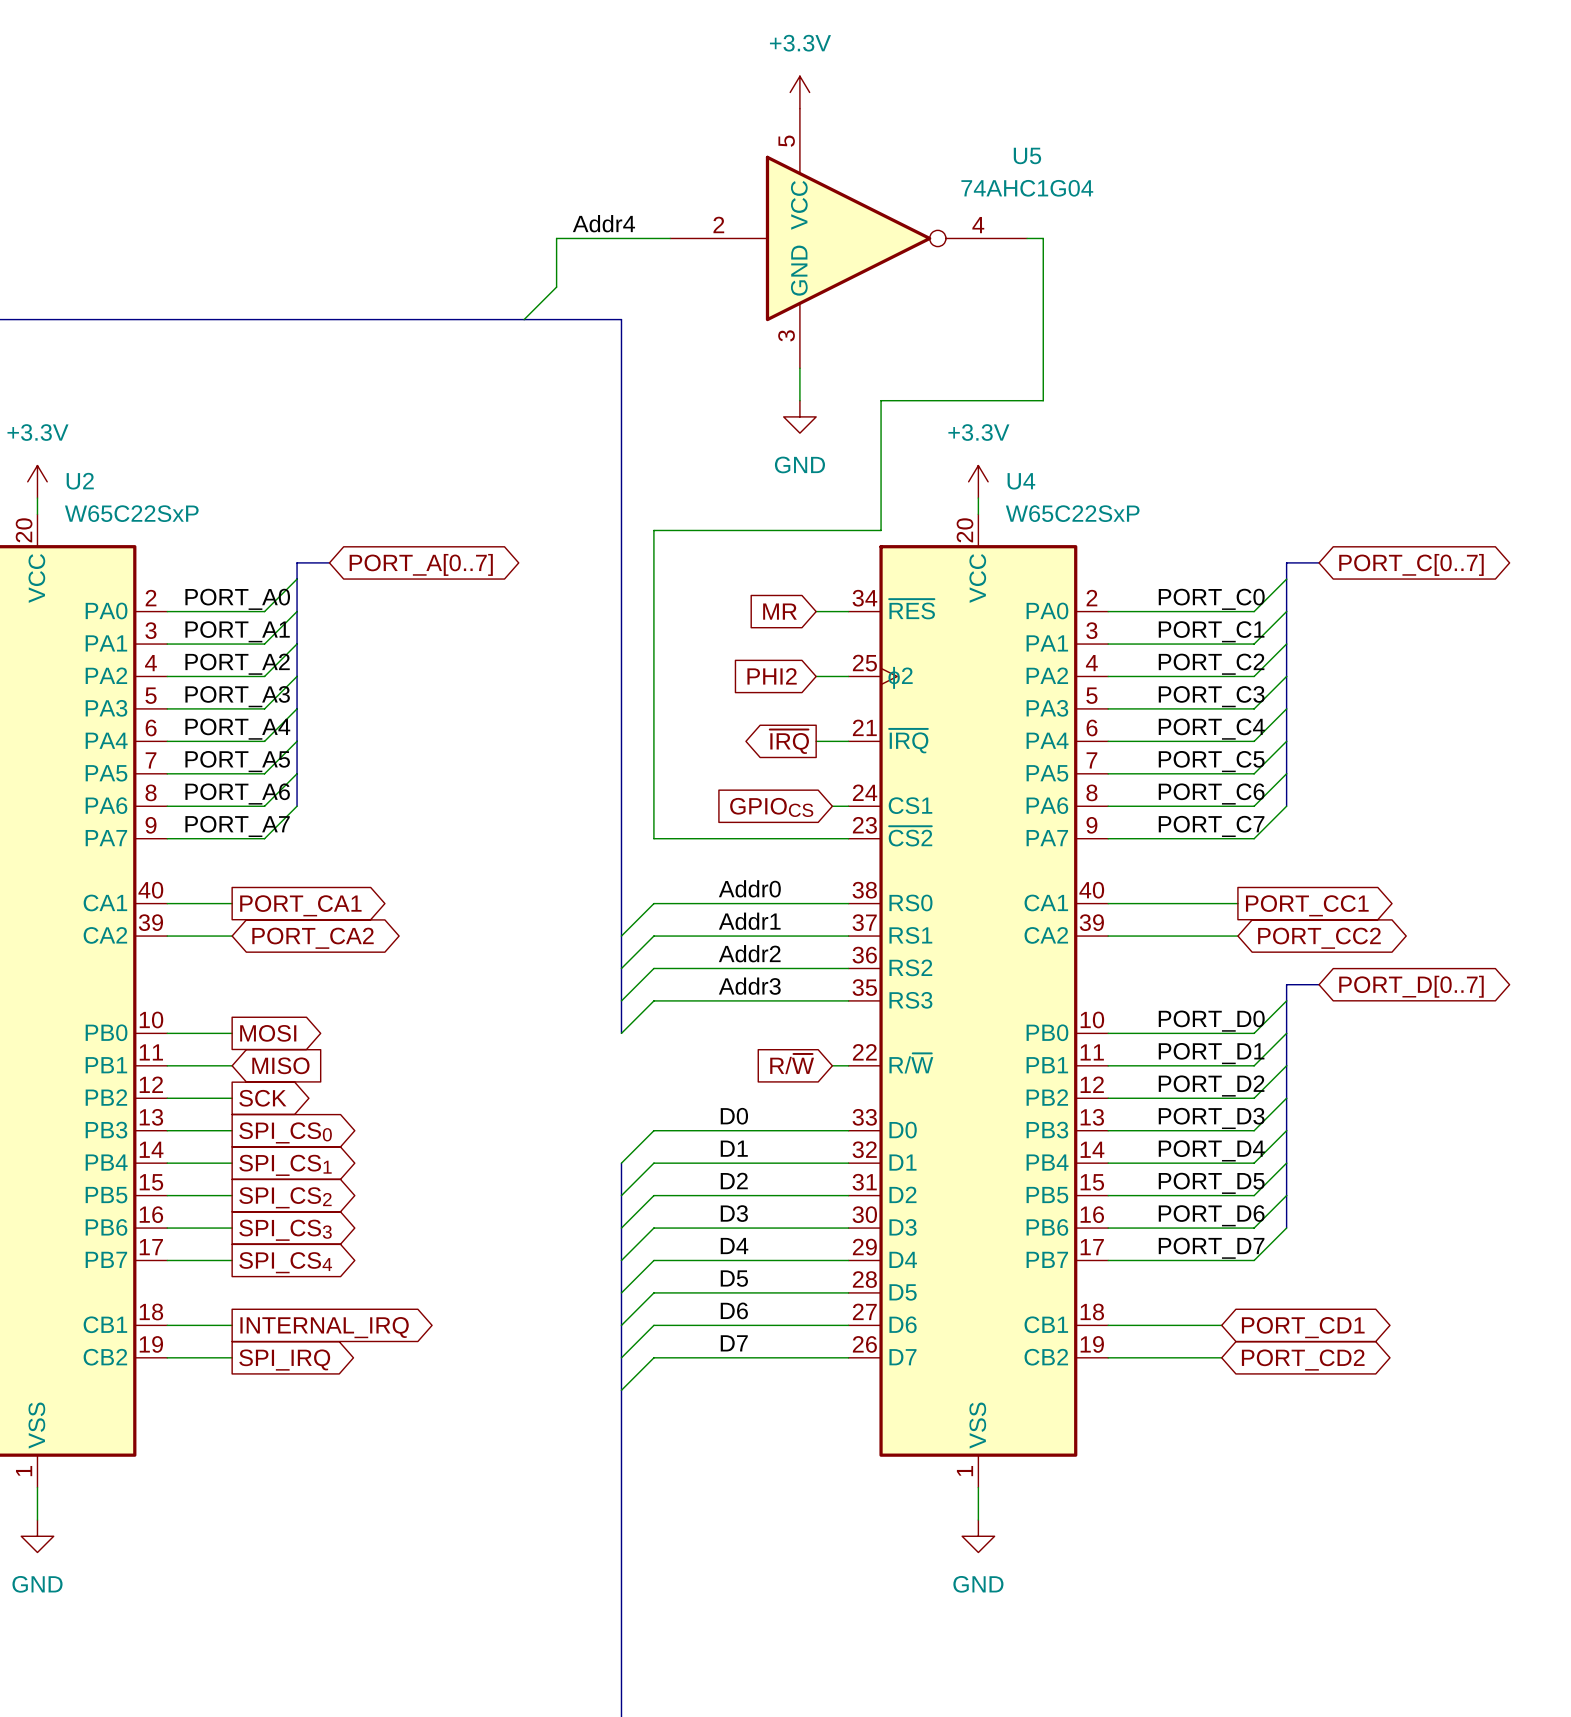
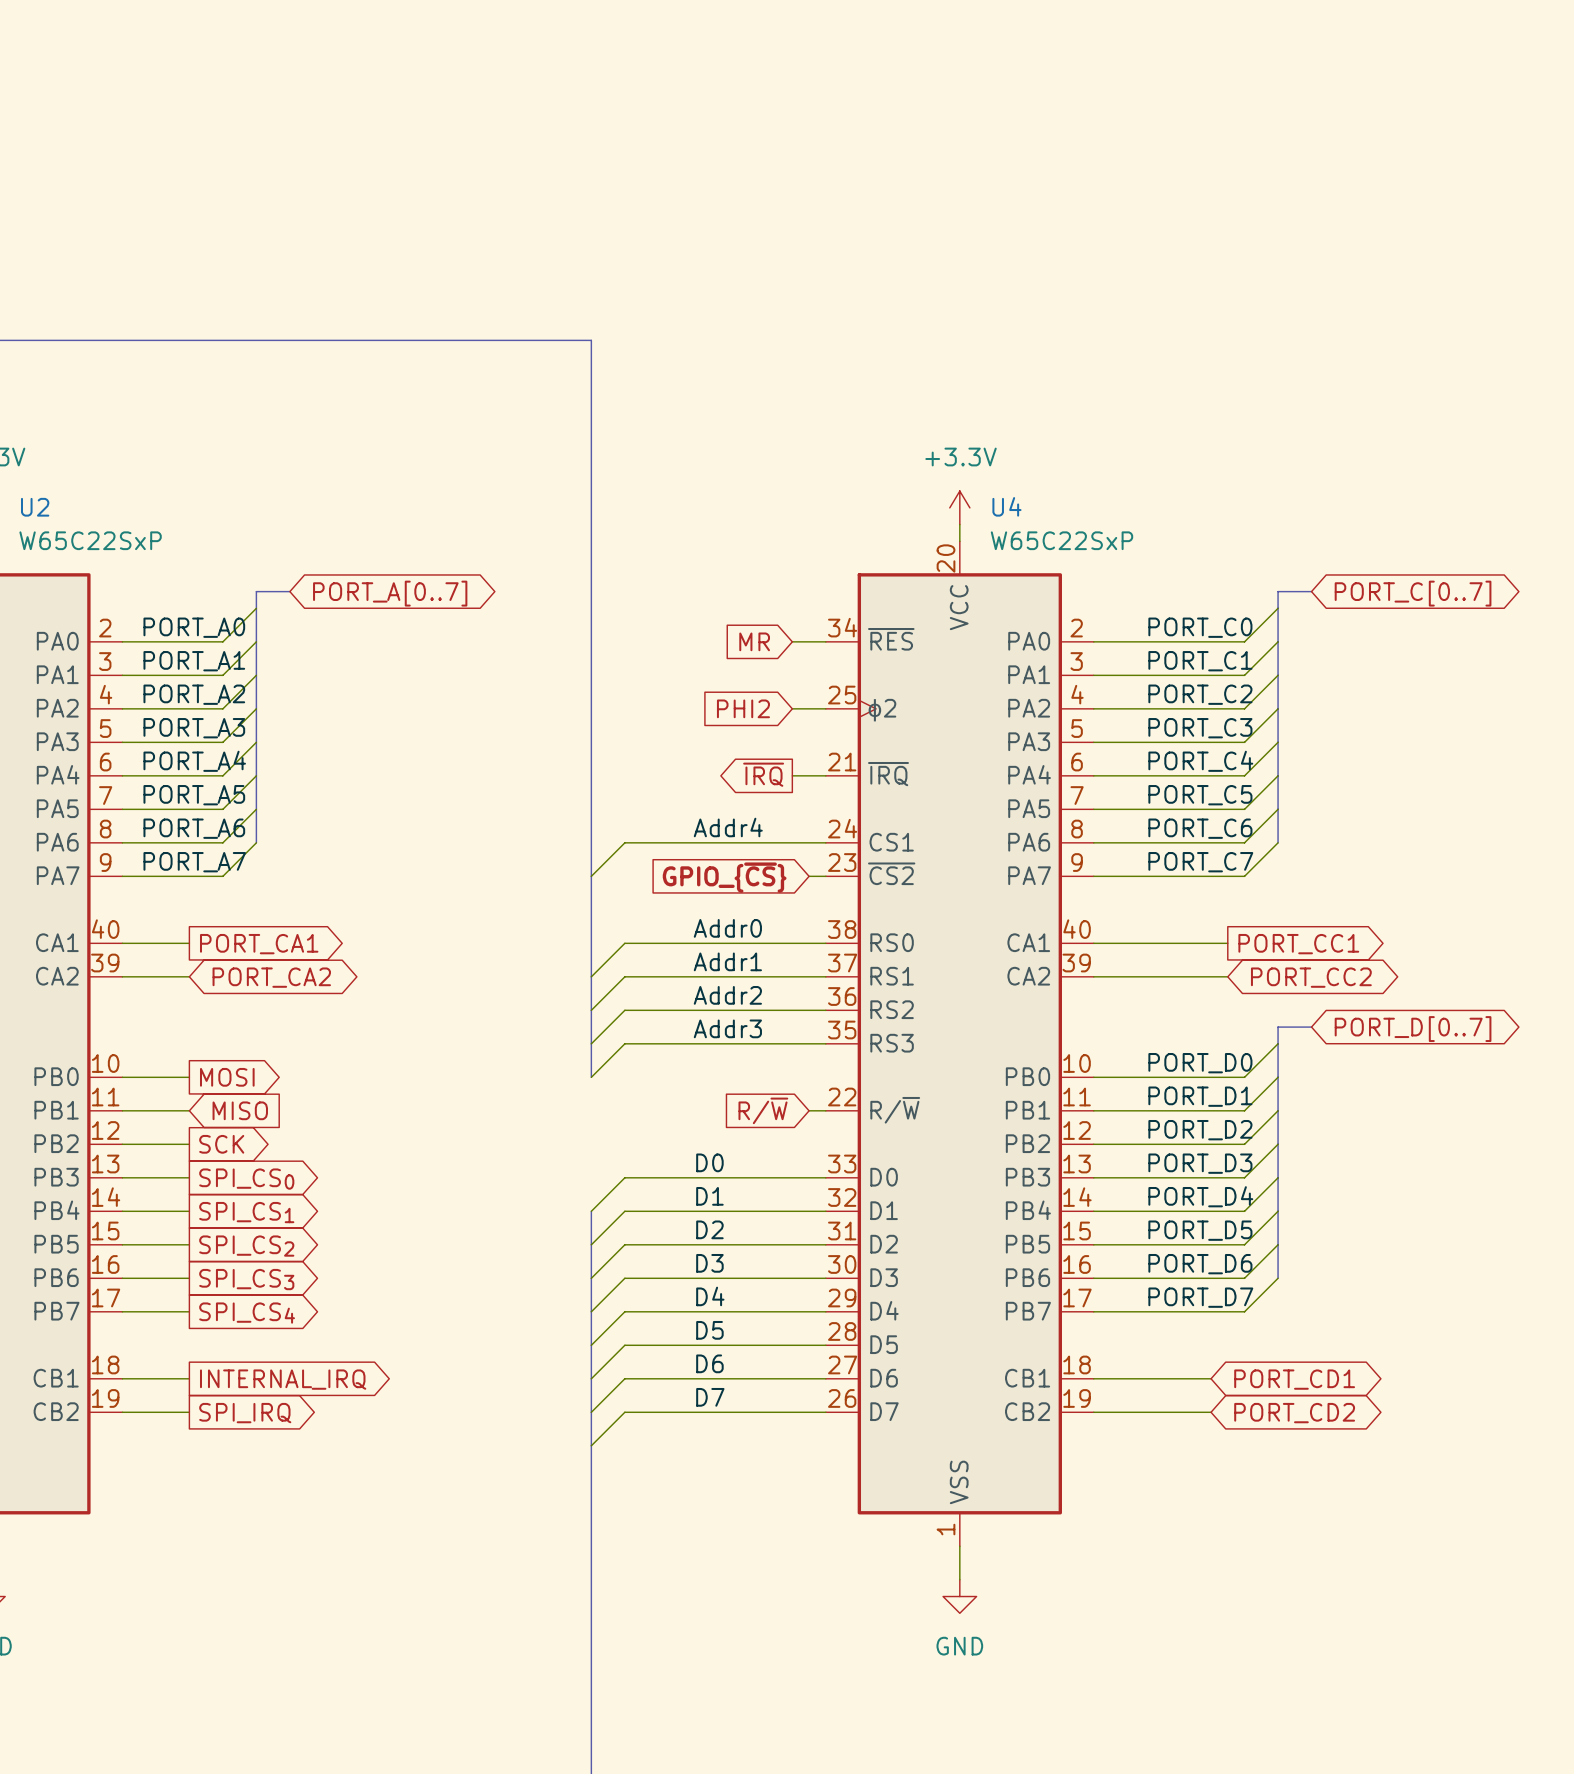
power symbol: +3.3V (799, 92) -> none
label: Addr4 (603, 223) -> none
wire: (670, 238) (556, 238) (556, 287) (524, 319) -> none
U5: 74AHC1G04 (848, 238) -> none
wire: (1027, 238) (1043, 238) (1043, 400) (881, 400) (881, 530) (653, 530) (653, 838) (832, 838) -> none
wire: (799, 368) (799, 400) -> none
power symbol: GND (799, 416) -> none
label: none -> Addr4 (728, 827)
wire: none -> (809, 842) (624, 842) (591, 876)
global label: GPIOCS (771, 807) -> GPIO_{~{CS}} (724, 877)

